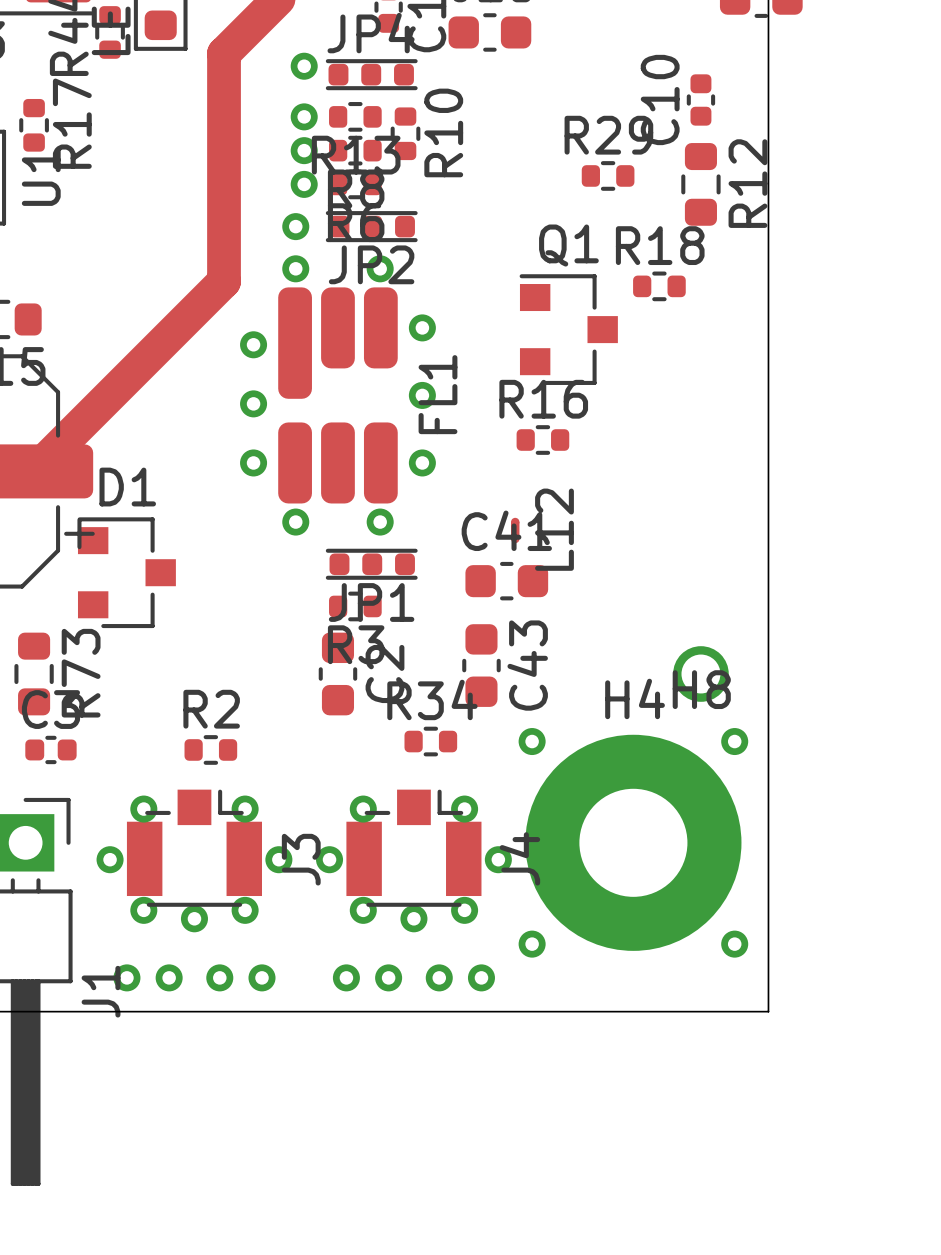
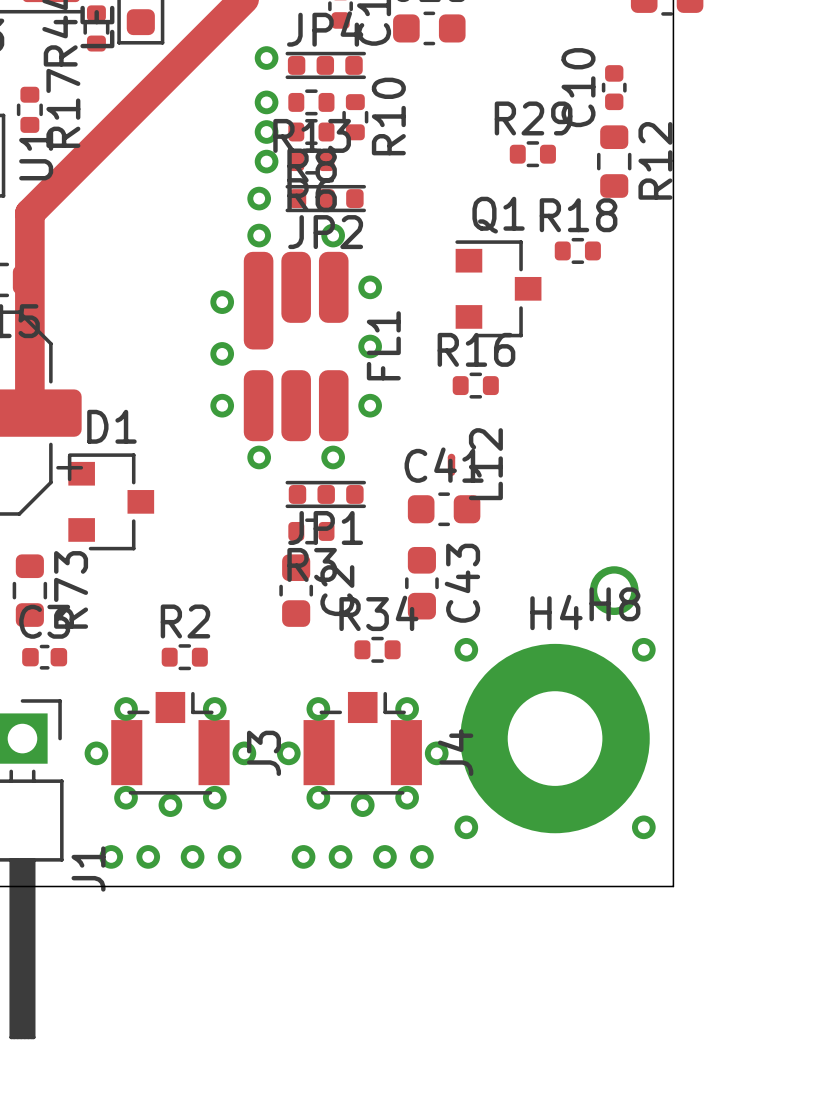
track: (224, 53) (224, 281) (34, 471) -> (196, 46) (29, 213) (29, 413)

